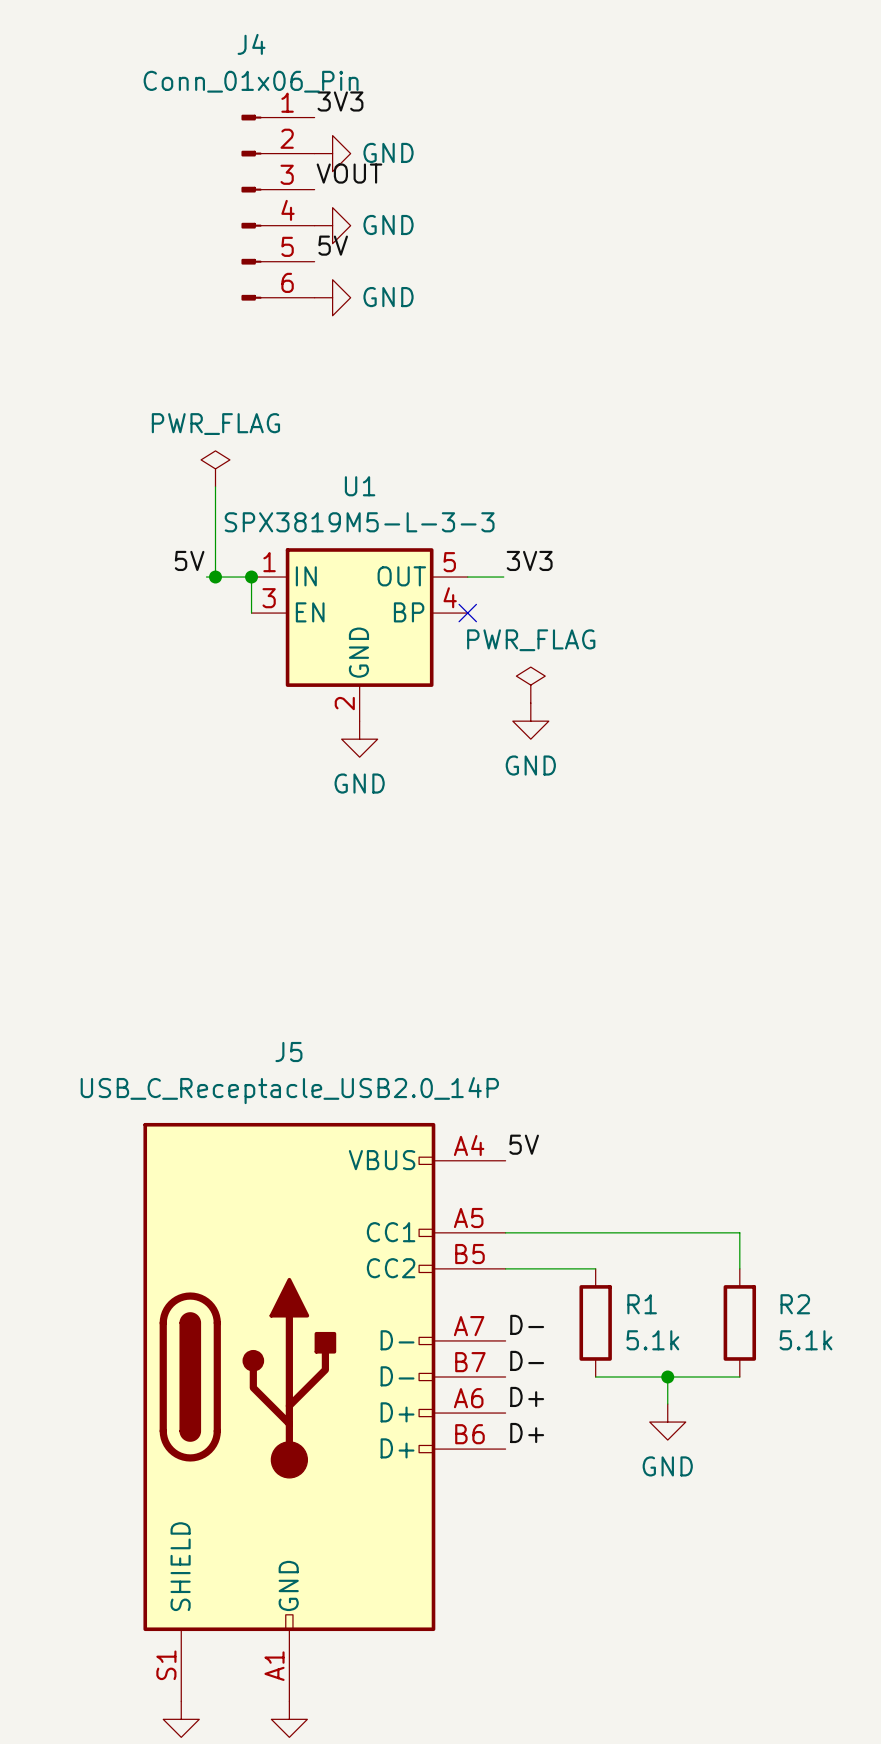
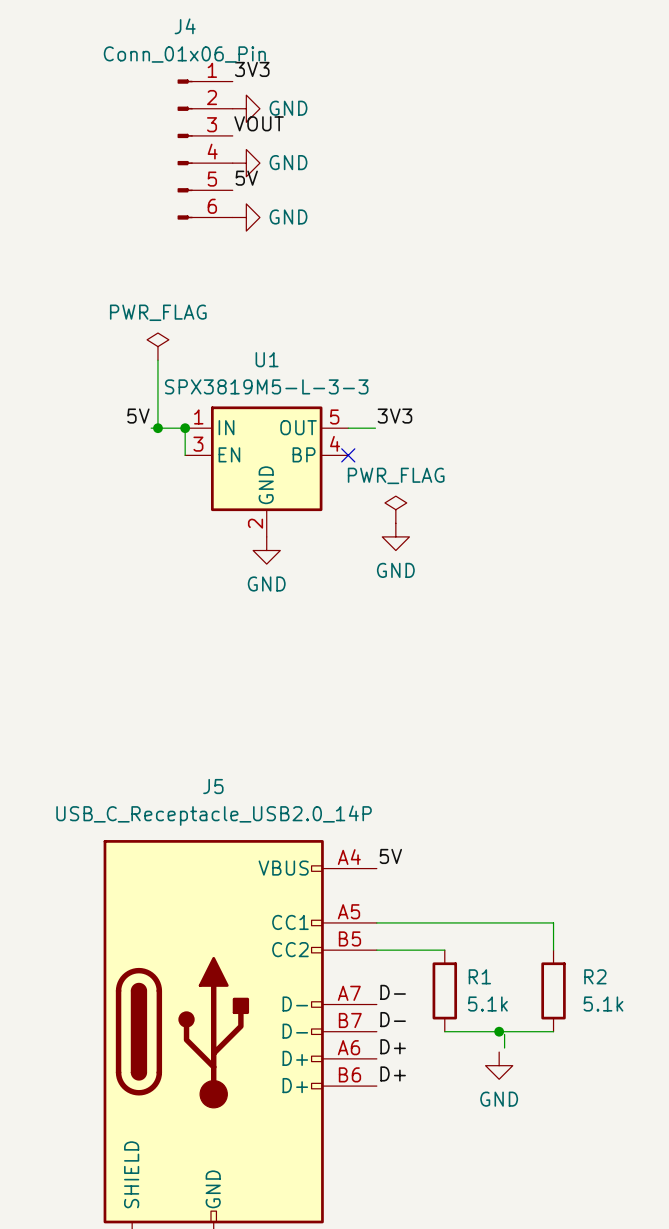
wire: (667, 1377) (667, 1404) -> none
wire: none -> (504, 1034) (504, 1048)

